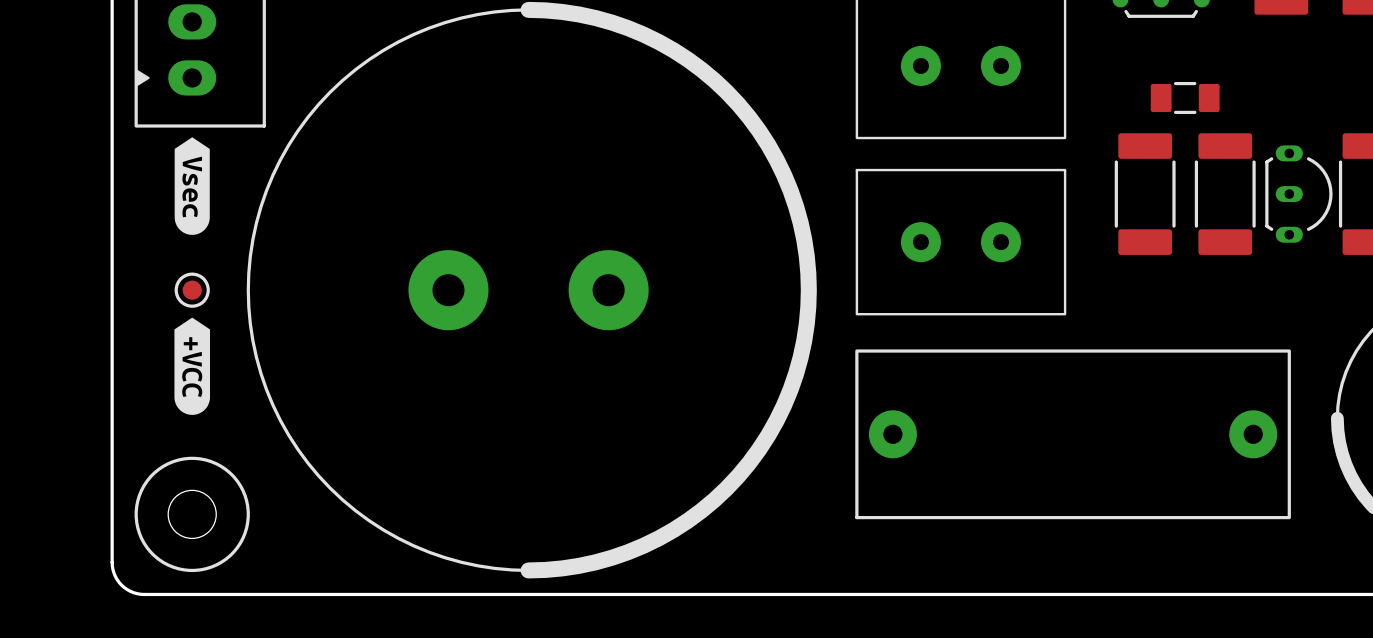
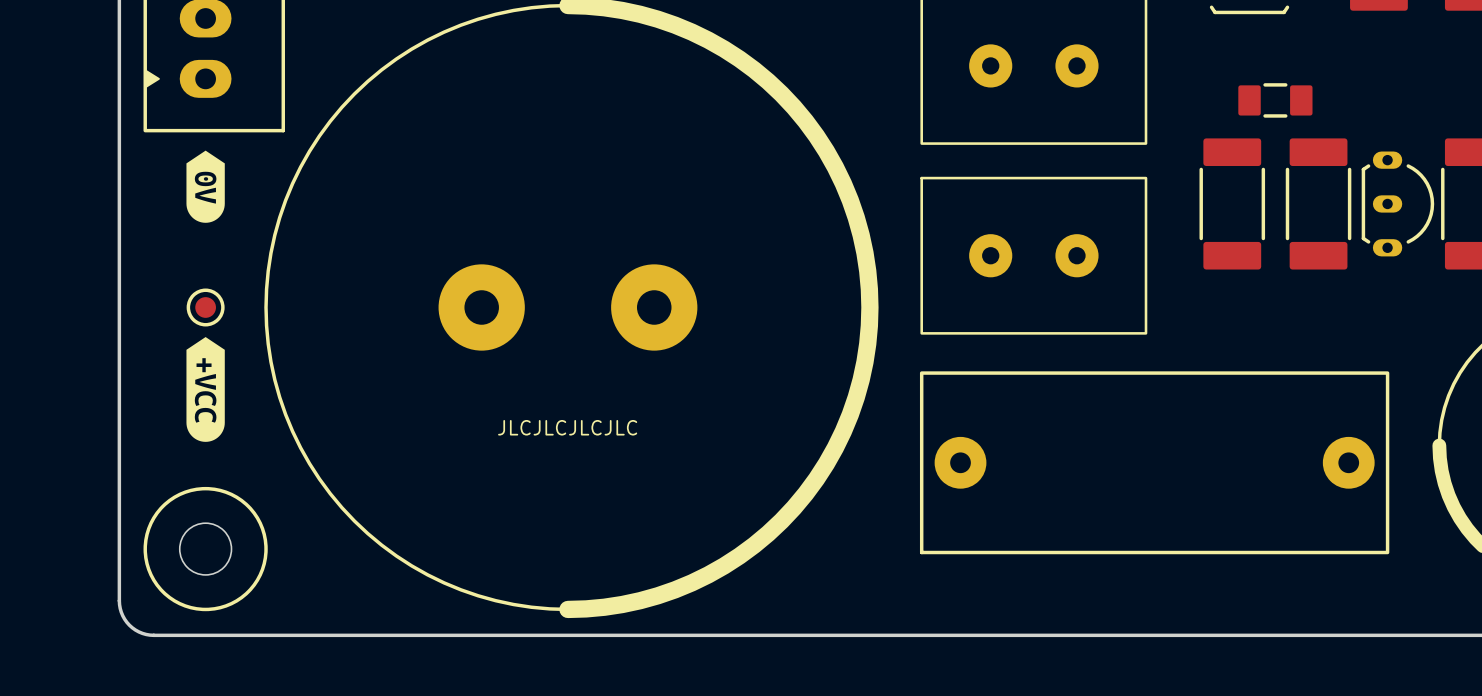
drawing shape: [174, 137, 210, 235] -> [186, 150, 225, 223]
text: none -> JLCJLCJLCJLC (567, 427)

